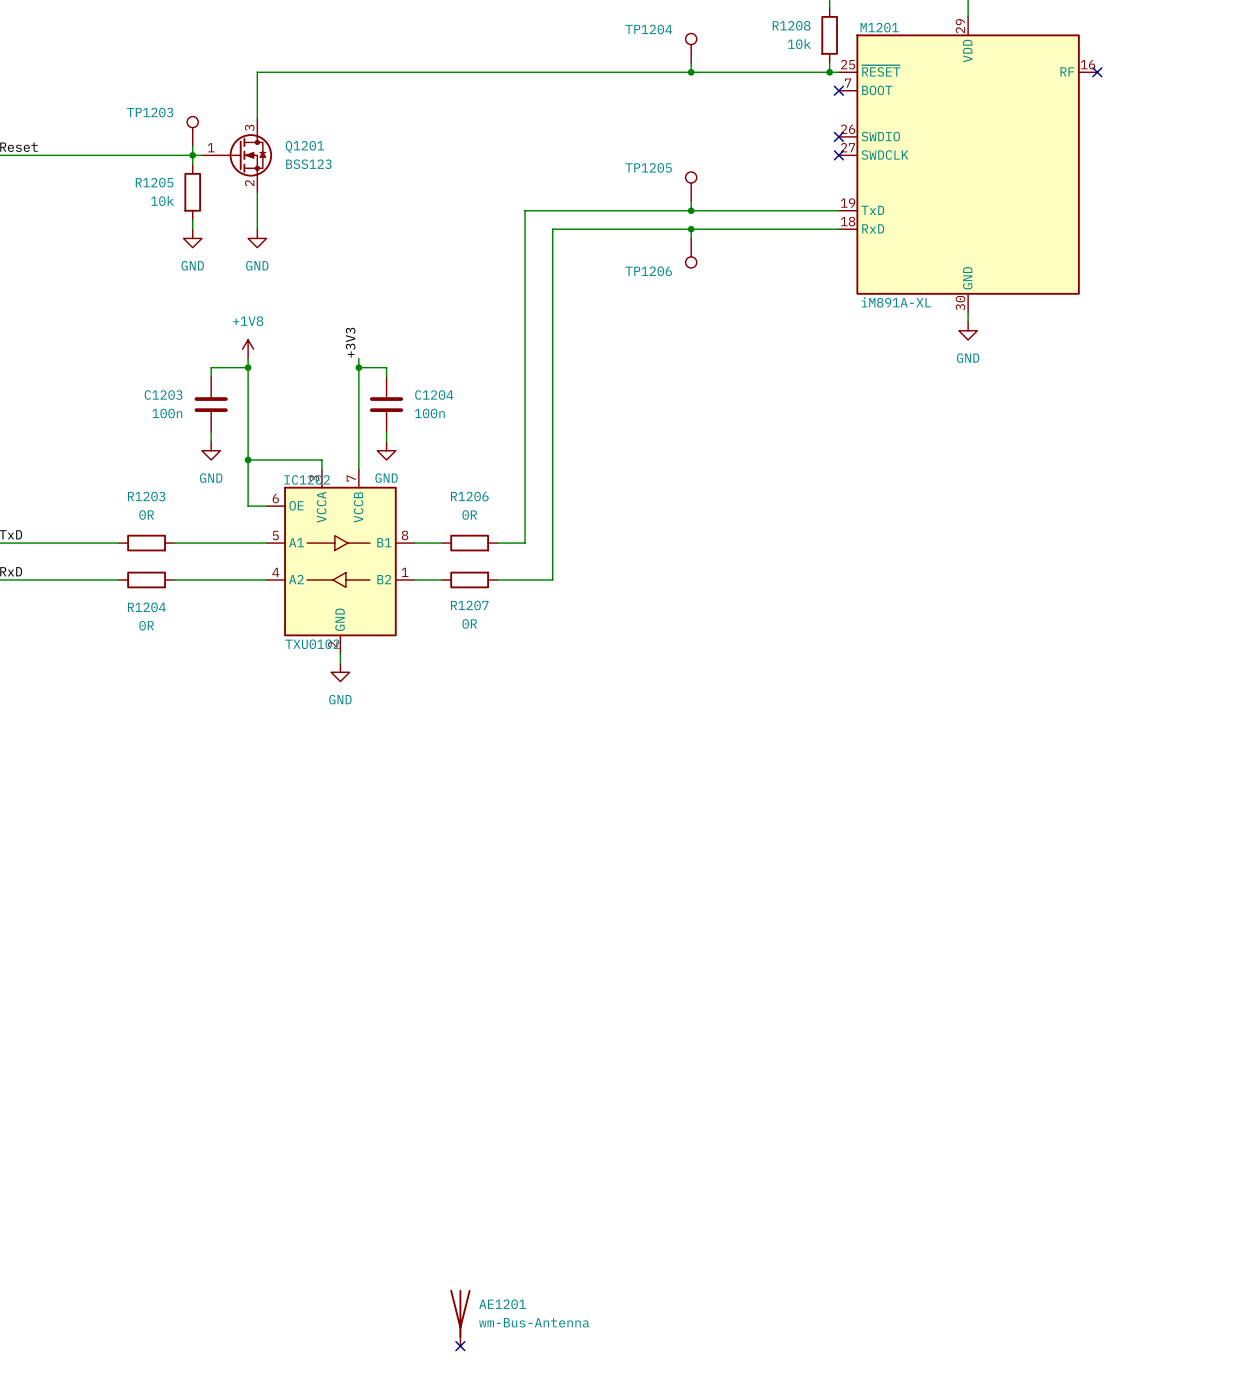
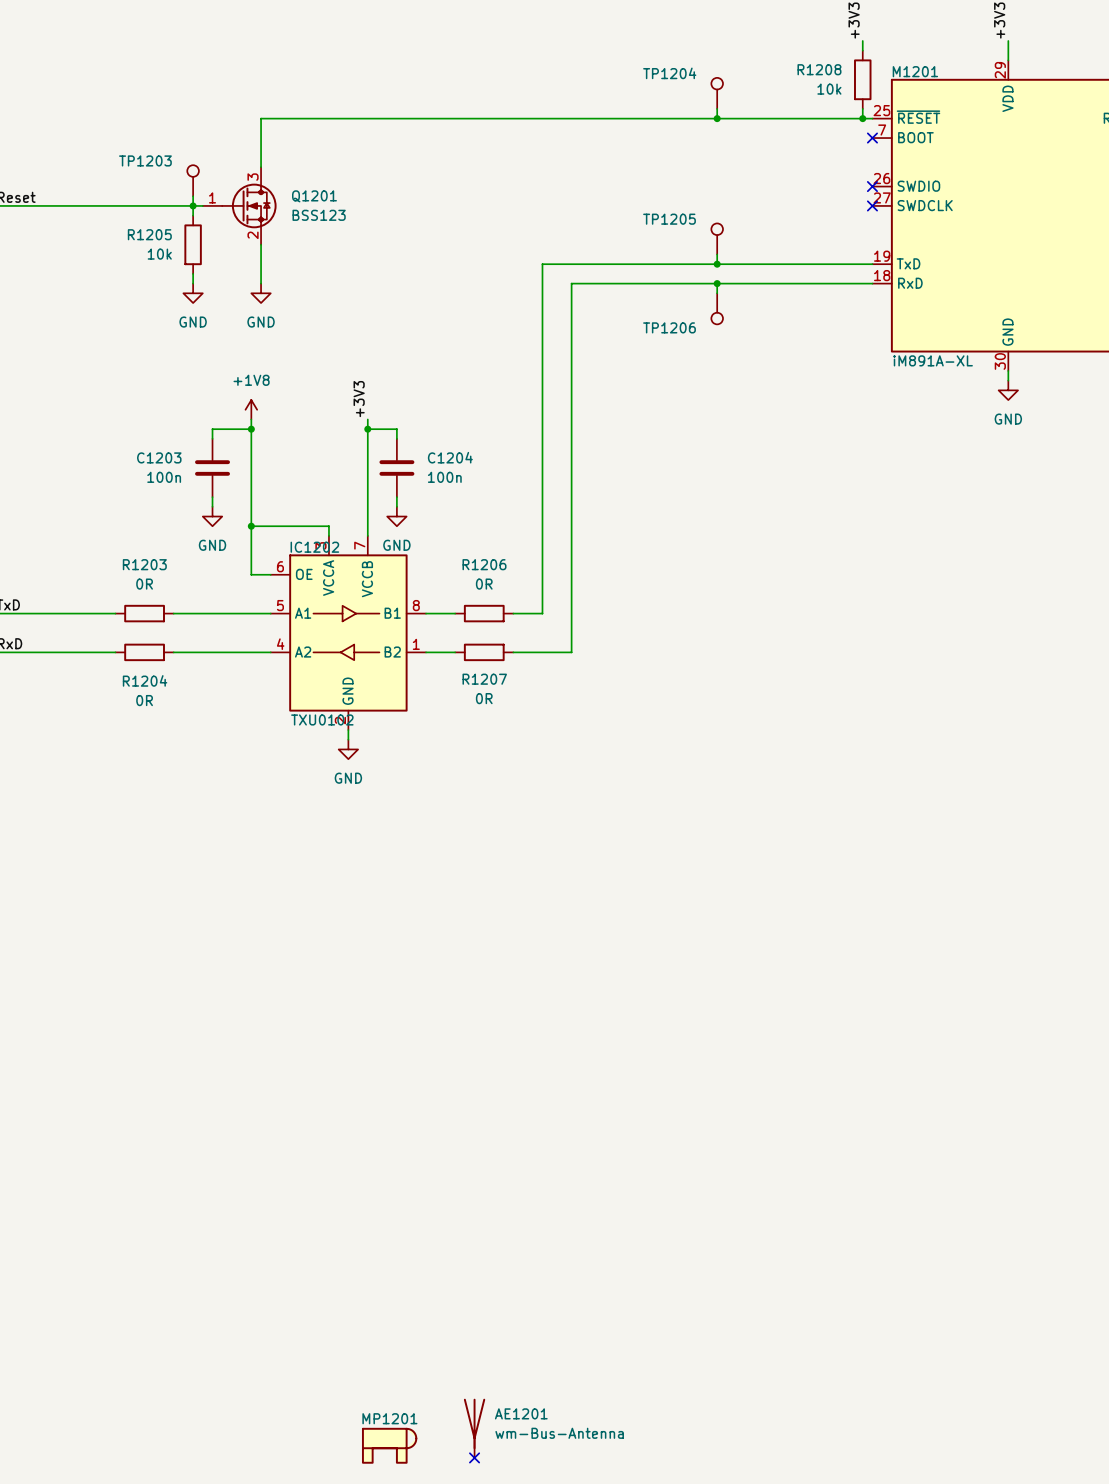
MP1201: none -> (389, 1445)

